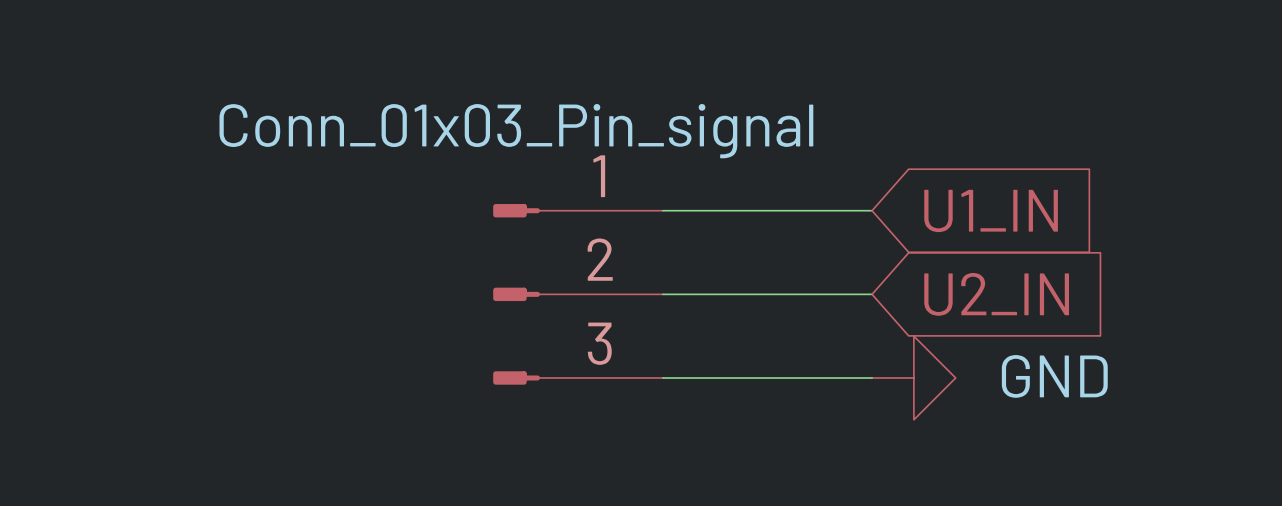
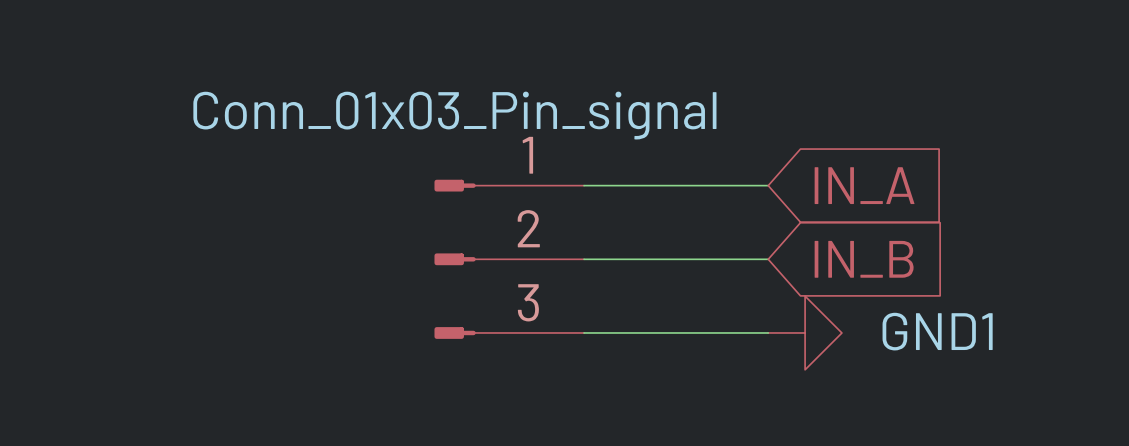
global label: U1_IN (991, 210) -> IN_A (864, 185)
global label: U2_IN (996, 294) -> IN_B (864, 259)
power symbol: GND (913, 377) -> GND1 (805, 332)

